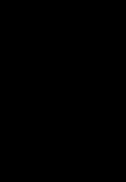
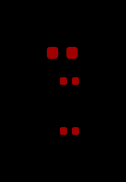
part: none -> (62, 52)
part: none -> (69, 81)
part: none -> (69, 131)

